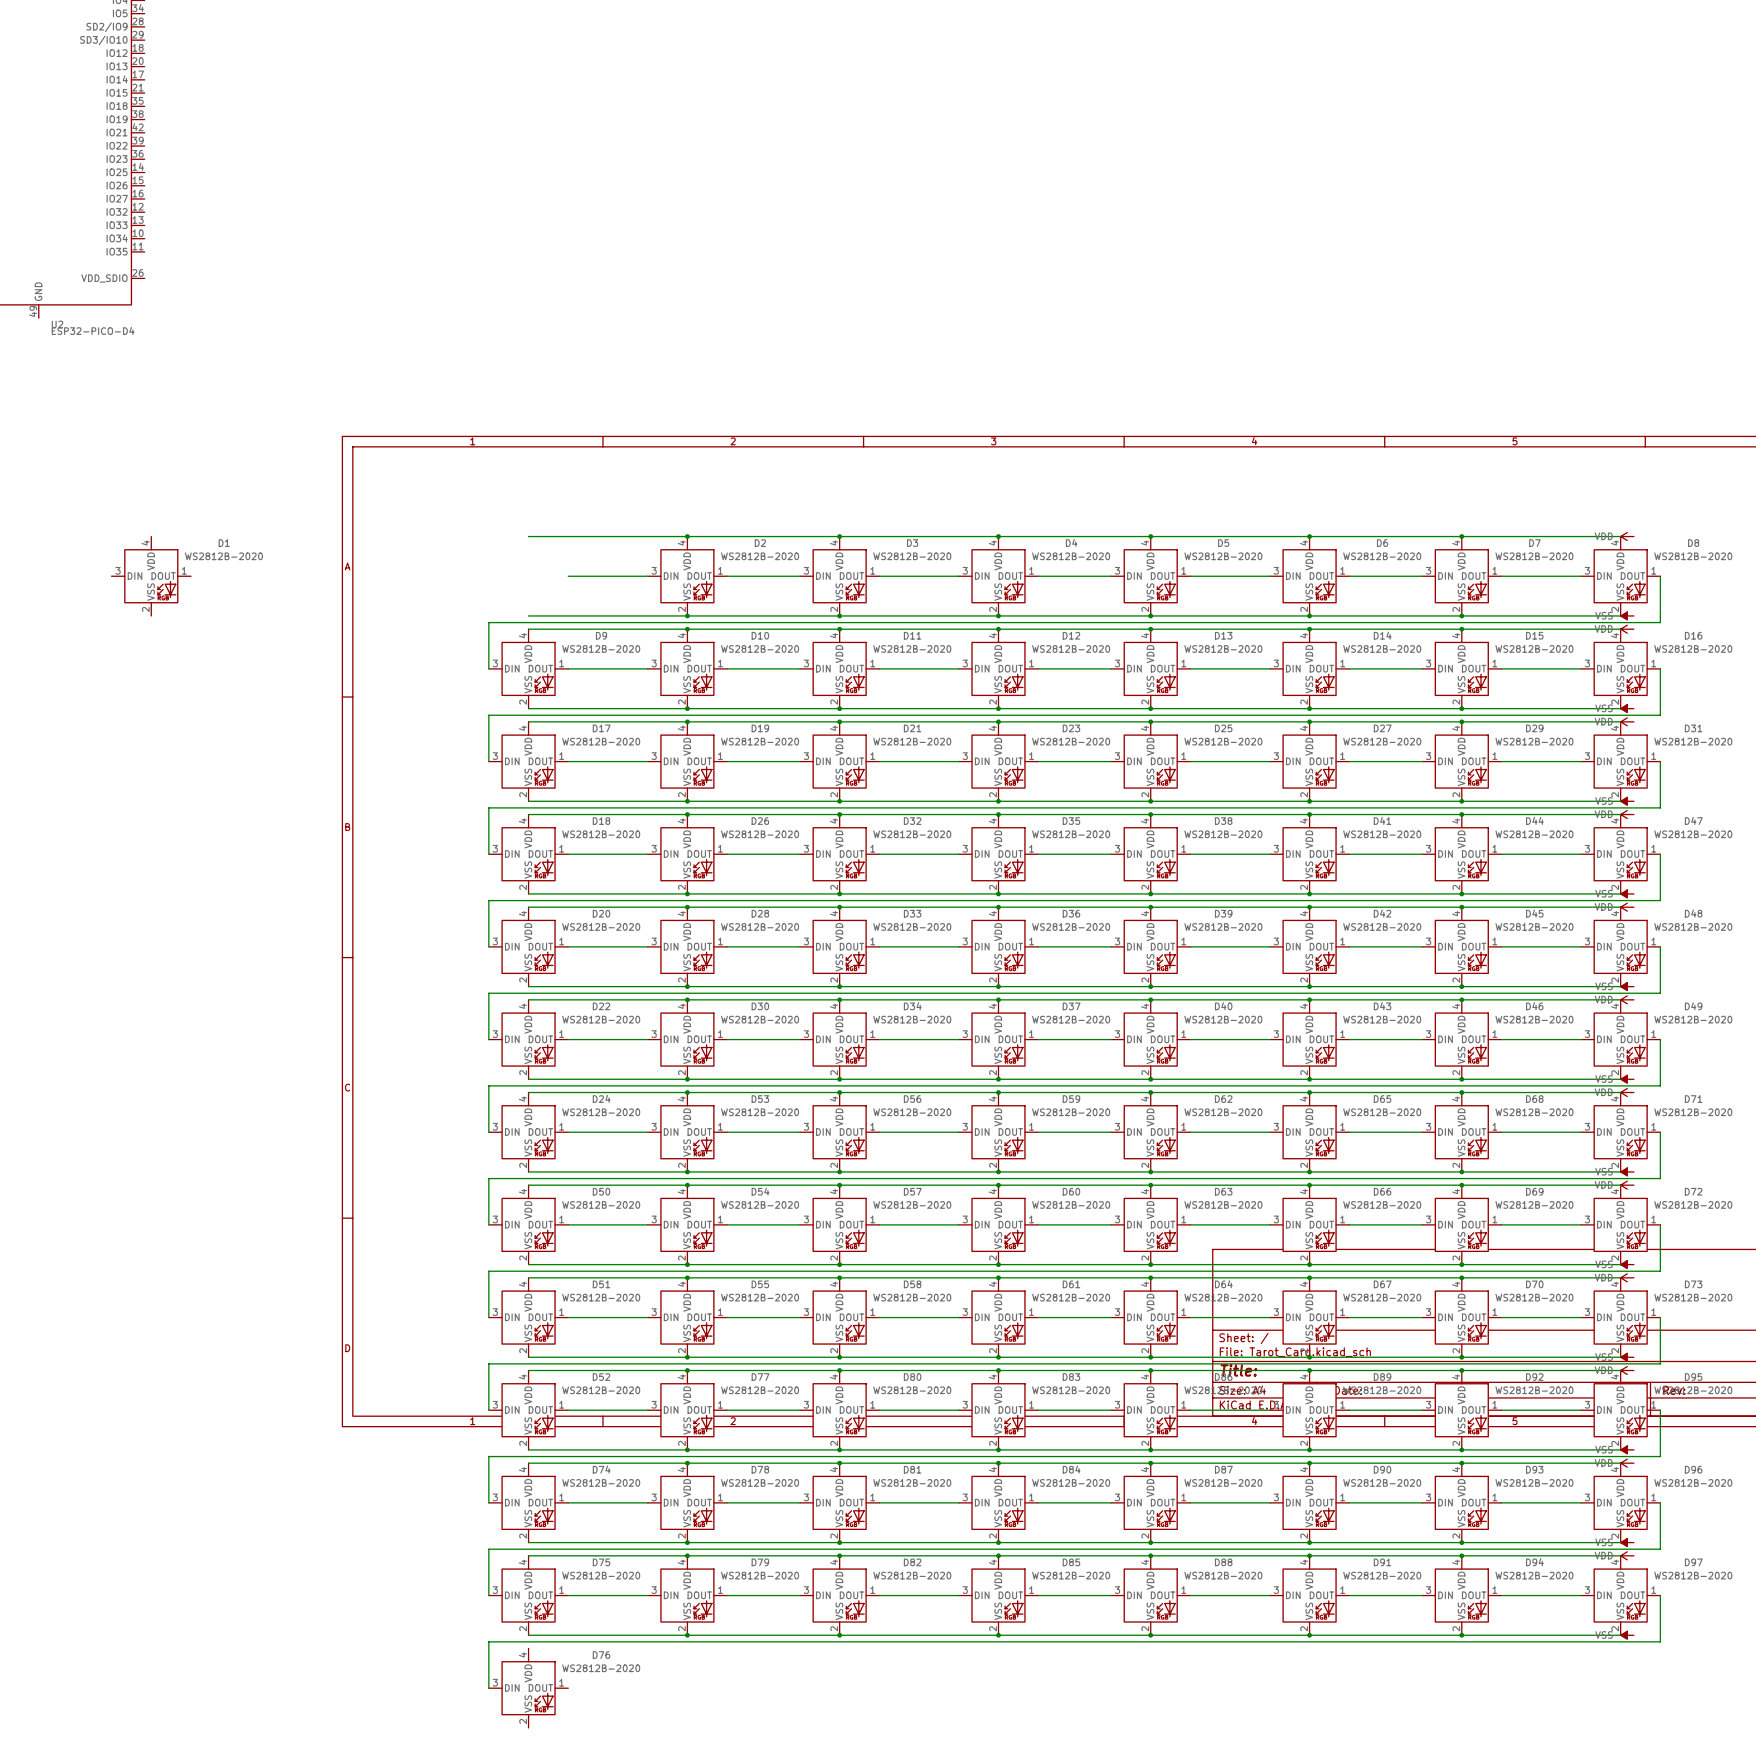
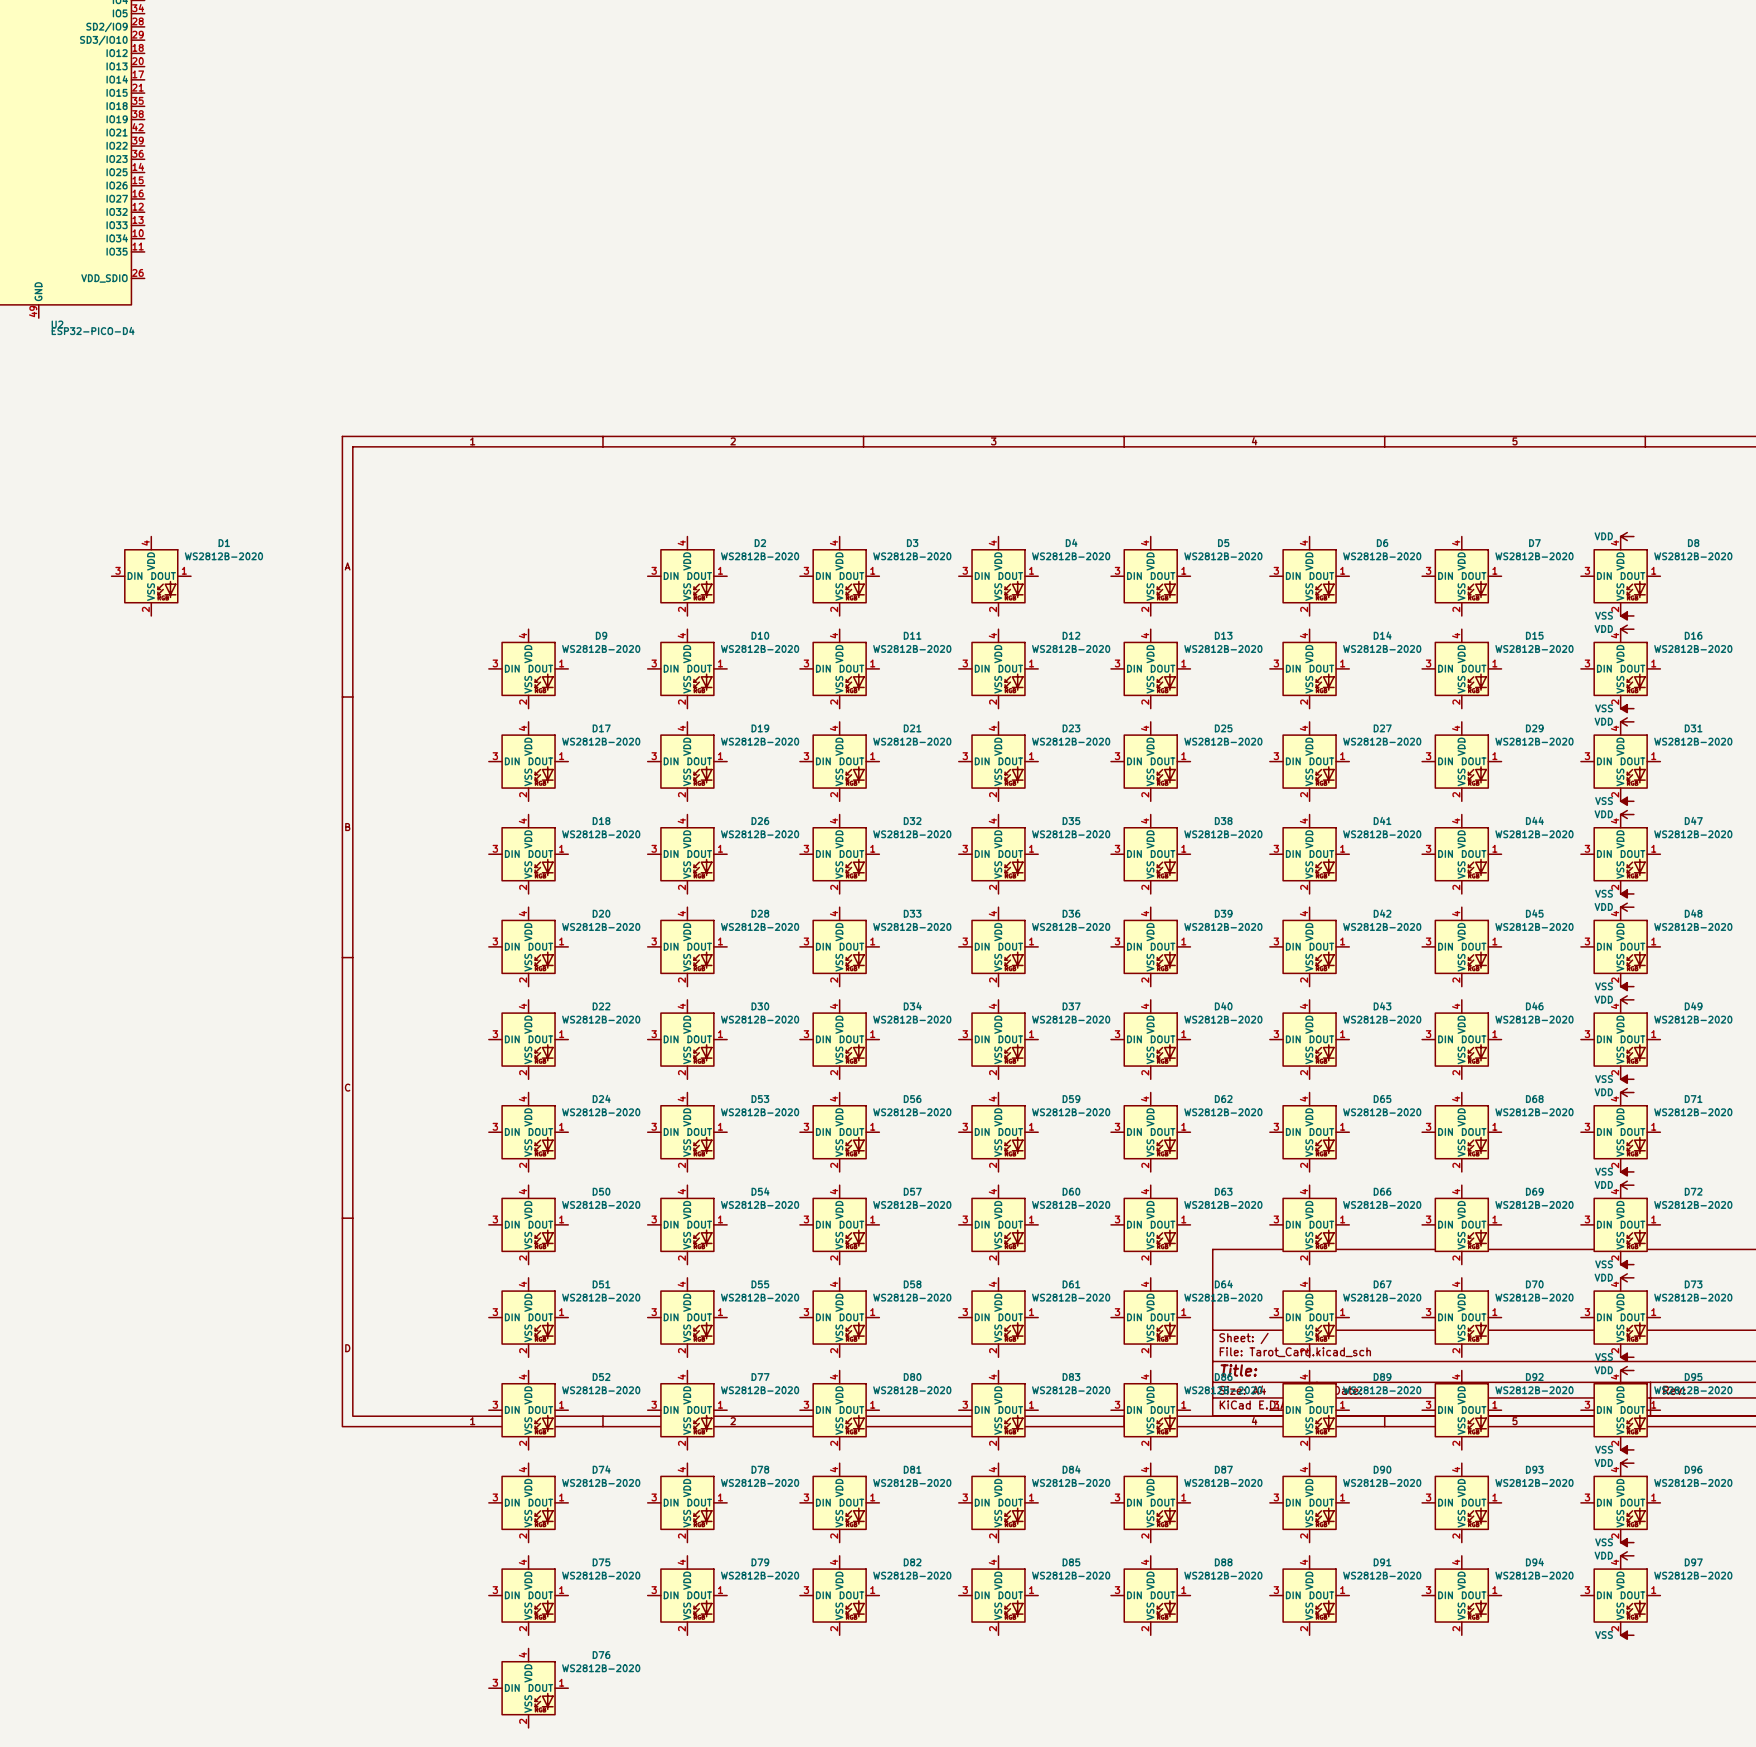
wire: (528, 536) (1620, 536) -> none
junction: (687, 536) -> none
junction: (839, 536) -> none
junction: (998, 536) -> none
junction: (1150, 536) -> none
junction: (1309, 536) -> none
junction: (1461, 536) -> none
wire: (568, 576) (647, 576) -> none
wire: (727, 576) (799, 576) -> none
wire: (879, 576) (958, 576) -> none
wire: (1038, 576) (1111, 576) -> none
wire: (1190, 576) (1269, 576) -> none
wire: (1349, 576) (1422, 576) -> none
wire: (1501, 576) (1580, 576) -> none
wire: (1660, 576) (1660, 622) (488, 622) (488, 668) -> none
wire: (528, 615) (1620, 615) -> none
junction: (687, 615) -> none
junction: (839, 615) -> none
junction: (998, 615) -> none
junction: (1150, 615) -> none
junction: (1309, 615) -> none
junction: (1461, 615) -> none
wire: (528, 629) (1620, 629) -> none
junction: (687, 629) -> none
junction: (839, 629) -> none
junction: (998, 629) -> none
junction: (1150, 629) -> none
junction: (1309, 629) -> none
junction: (1461, 629) -> none
wire: (568, 668) (647, 668) -> none
wire: (727, 668) (799, 668) -> none
wire: (879, 668) (958, 668) -> none
wire: (1038, 668) (1111, 668) -> none
wire: (1190, 668) (1269, 668) -> none
wire: (1349, 668) (1422, 668) -> none
wire: (1501, 668) (1580, 668) -> none
wire: (1660, 668) (1660, 715) (488, 715) (488, 761) -> none
wire: (528, 708) (1620, 708) -> none
junction: (687, 708) -> none
junction: (839, 708) -> none
junction: (998, 708) -> none
junction: (1150, 708) -> none
junction: (1309, 708) -> none
junction: (1461, 708) -> none
wire: (528, 721) (1620, 721) -> none
junction: (687, 721) -> none
junction: (839, 721) -> none
junction: (998, 721) -> none
junction: (1150, 721) -> none
junction: (1309, 721) -> none
junction: (1461, 721) -> none
wire: (568, 761) (647, 761) -> none
wire: (727, 761) (799, 761) -> none
wire: (879, 761) (958, 761) -> none
wire: (1038, 761) (1111, 761) -> none
wire: (1190, 761) (1269, 761) -> none
wire: (1349, 761) (1422, 761) -> none
wire: (1501, 761) (1580, 761) -> none
wire: (1660, 761) (1660, 807) (488, 807) (488, 854) -> none
wire: (528, 801) (1620, 801) -> none
junction: (687, 801) -> none
junction: (839, 801) -> none
junction: (998, 801) -> none
junction: (1150, 801) -> none
junction: (1309, 801) -> none
junction: (1461, 801) -> none
wire: (528, 814) (1620, 814) -> none
junction: (687, 814) -> none
junction: (839, 814) -> none
junction: (998, 814) -> none
junction: (1150, 814) -> none
junction: (1309, 814) -> none
junction: (1461, 814) -> none
wire: (568, 854) (647, 854) -> none
wire: (727, 854) (799, 854) -> none
wire: (879, 854) (958, 854) -> none
wire: (1038, 854) (1111, 854) -> none
wire: (1190, 854) (1269, 854) -> none
wire: (1349, 854) (1422, 854) -> none
wire: (1501, 854) (1580, 854) -> none
wire: (1660, 854) (1660, 900) (488, 900) (488, 946) -> none
wire: (528, 893) (1620, 893) -> none
junction: (687, 893) -> none
junction: (839, 893) -> none
junction: (998, 893) -> none
junction: (1150, 893) -> none
junction: (1309, 893) -> none
junction: (1461, 893) -> none
wire: (528, 907) (1620, 907) -> none
junction: (687, 907) -> none
junction: (839, 907) -> none
junction: (998, 907) -> none
junction: (1150, 907) -> none
junction: (1309, 907) -> none
junction: (1461, 907) -> none
wire: (568, 946) (647, 946) -> none
wire: (727, 946) (799, 946) -> none
wire: (879, 946) (958, 946) -> none
wire: (1038, 946) (1111, 946) -> none
wire: (1190, 946) (1269, 946) -> none
wire: (1349, 946) (1422, 946) -> none
wire: (1501, 946) (1580, 946) -> none
wire: (1660, 946) (1660, 993) (488, 993) (488, 1039) -> none
wire: (528, 986) (1620, 986) -> none
junction: (687, 986) -> none
junction: (839, 986) -> none
junction: (998, 986) -> none
junction: (1150, 986) -> none
junction: (1309, 986) -> none
junction: (1461, 986) -> none
wire: (528, 999) (1620, 999) -> none
junction: (687, 999) -> none
junction: (839, 999) -> none
junction: (998, 999) -> none
junction: (1150, 999) -> none
junction: (1309, 999) -> none
junction: (1461, 999) -> none
wire: (568, 1039) (647, 1039) -> none
wire: (727, 1039) (799, 1039) -> none
wire: (879, 1039) (958, 1039) -> none
wire: (1038, 1039) (1111, 1039) -> none
wire: (1190, 1039) (1269, 1039) -> none
wire: (1349, 1039) (1422, 1039) -> none
wire: (1501, 1039) (1580, 1039) -> none
wire: (1660, 1039) (1660, 1085) (488, 1085) (488, 1132) -> none
wire: (528, 1079) (1620, 1079) -> none
junction: (687, 1079) -> none
junction: (839, 1079) -> none
junction: (998, 1079) -> none
junction: (1150, 1079) -> none
junction: (1309, 1079) -> none
junction: (1461, 1079) -> none
wire: (528, 1092) (1620, 1092) -> none
junction: (687, 1092) -> none
junction: (839, 1092) -> none
junction: (998, 1092) -> none
junction: (1150, 1092) -> none
junction: (1309, 1092) -> none
junction: (1461, 1092) -> none
wire: (568, 1132) (647, 1132) -> none
wire: (727, 1132) (799, 1132) -> none
wire: (879, 1132) (958, 1132) -> none
wire: (1038, 1132) (1111, 1132) -> none
wire: (1190, 1132) (1269, 1132) -> none
wire: (1349, 1132) (1422, 1132) -> none
wire: (1501, 1132) (1580, 1132) -> none
wire: (1660, 1132) (1660, 1178) (488, 1178) (488, 1224) -> none
wire: (528, 1171) (1620, 1171) -> none
junction: (687, 1171) -> none
junction: (839, 1171) -> none
junction: (998, 1171) -> none
junction: (1150, 1171) -> none
junction: (1309, 1171) -> none
junction: (1461, 1171) -> none
wire: (528, 1185) (1620, 1185) -> none
junction: (687, 1185) -> none
junction: (839, 1185) -> none
junction: (998, 1185) -> none
junction: (1150, 1185) -> none
junction: (1309, 1185) -> none
junction: (1461, 1185) -> none
wire: (568, 1224) (647, 1224) -> none
wire: (727, 1224) (799, 1224) -> none
wire: (879, 1224) (958, 1224) -> none
wire: (1038, 1224) (1111, 1224) -> none
wire: (1190, 1224) (1269, 1224) -> none
wire: (1349, 1224) (1422, 1224) -> none
wire: (1501, 1224) (1580, 1224) -> none
wire: (1660, 1224) (1660, 1271) (488, 1271) (488, 1317) -> none
wire: (528, 1264) (1620, 1264) -> none
junction: (687, 1264) -> none
junction: (839, 1264) -> none
junction: (998, 1264) -> none
junction: (1150, 1264) -> none
junction: (1309, 1264) -> none
junction: (1461, 1264) -> none
wire: (528, 1277) (1620, 1277) -> none
junction: (687, 1277) -> none
junction: (839, 1277) -> none
junction: (998, 1277) -> none
junction: (1150, 1277) -> none
junction: (1309, 1277) -> none
junction: (1461, 1277) -> none
wire: (568, 1317) (647, 1317) -> none
wire: (727, 1317) (799, 1317) -> none
wire: (879, 1317) (958, 1317) -> none
wire: (1038, 1317) (1111, 1317) -> none
wire: (1190, 1317) (1269, 1317) -> none
wire: (1349, 1317) (1422, 1317) -> none
wire: (1501, 1317) (1580, 1317) -> none
wire: (1660, 1317) (1660, 1363) (488, 1363) (488, 1410) -> none
wire: (528, 1357) (1620, 1357) -> none
junction: (687, 1357) -> none
junction: (839, 1357) -> none
junction: (998, 1357) -> none
junction: (1150, 1357) -> none
junction: (1309, 1357) -> none
junction: (1461, 1357) -> none
wire: (528, 1370) (1620, 1370) -> none
junction: (687, 1370) -> none
junction: (839, 1370) -> none
junction: (998, 1370) -> none
junction: (1150, 1370) -> none
junction: (1309, 1370) -> none
junction: (1461, 1370) -> none
wire: (568, 1410) (647, 1410) -> none
wire: (727, 1410) (799, 1410) -> none
wire: (879, 1410) (958, 1410) -> none
wire: (1038, 1410) (1111, 1410) -> none
wire: (1190, 1410) (1269, 1410) -> none
wire: (1349, 1410) (1422, 1410) -> none
wire: (1501, 1410) (1580, 1410) -> none
wire: (1660, 1410) (1660, 1456) (488, 1456) (488, 1502) -> none
wire: (528, 1449) (1620, 1449) -> none
junction: (687, 1449) -> none
junction: (839, 1449) -> none
junction: (998, 1449) -> none
junction: (1150, 1449) -> none
junction: (1309, 1449) -> none
junction: (1461, 1449) -> none
wire: (528, 1463) (1620, 1463) -> none
junction: (687, 1463) -> none
junction: (839, 1463) -> none
junction: (998, 1463) -> none
junction: (1150, 1463) -> none
junction: (1309, 1463) -> none
junction: (1461, 1463) -> none
wire: (568, 1502) (647, 1502) -> none
wire: (727, 1502) (799, 1502) -> none
wire: (879, 1502) (958, 1502) -> none
wire: (1038, 1502) (1111, 1502) -> none
wire: (1190, 1502) (1269, 1502) -> none
wire: (1349, 1502) (1422, 1502) -> none
wire: (1501, 1502) (1580, 1502) -> none
wire: (1660, 1502) (1660, 1549) (488, 1549) (488, 1595) -> none
wire: (528, 1542) (1620, 1542) -> none
junction: (687, 1542) -> none
junction: (839, 1542) -> none
junction: (998, 1542) -> none
junction: (1150, 1542) -> none
junction: (1309, 1542) -> none
junction: (1461, 1542) -> none
wire: (528, 1555) (1620, 1555) -> none
junction: (687, 1555) -> none
junction: (839, 1555) -> none
junction: (998, 1555) -> none
junction: (1150, 1555) -> none
junction: (1309, 1555) -> none
junction: (1461, 1555) -> none
wire: (568, 1595) (647, 1595) -> none
wire: (727, 1595) (799, 1595) -> none
wire: (879, 1595) (958, 1595) -> none
wire: (1038, 1595) (1111, 1595) -> none
wire: (1190, 1595) (1269, 1595) -> none
wire: (1349, 1595) (1422, 1595) -> none
wire: (1501, 1595) (1580, 1595) -> none
wire: (1660, 1595) (1660, 1641) (488, 1641) (488, 1688) -> none
wire: (528, 1635) (1620, 1635) -> none
junction: (687, 1635) -> none
junction: (839, 1635) -> none
junction: (998, 1635) -> none
junction: (1150, 1635) -> none
junction: (1309, 1635) -> none
junction: (1461, 1635) -> none

